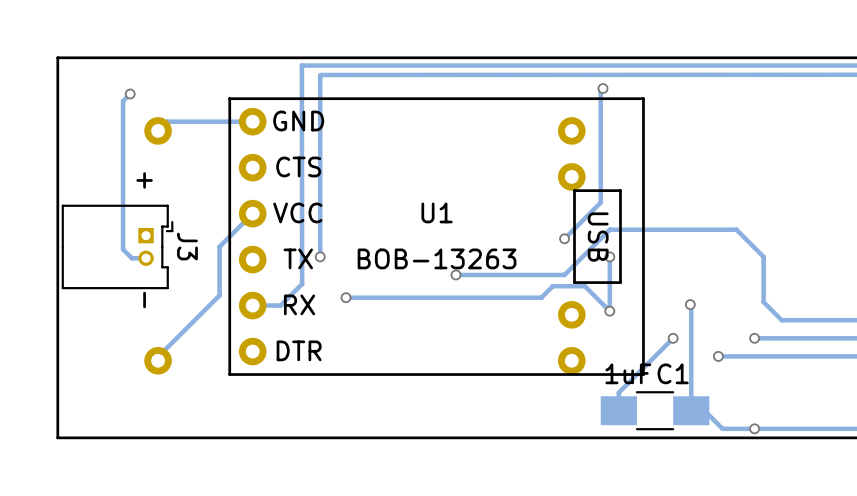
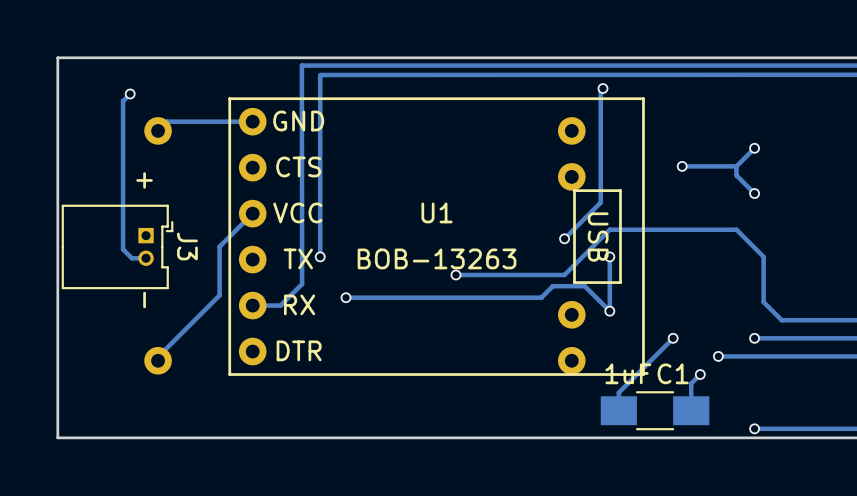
track: none -> (754, 148) (736, 166)
via: none -> (754, 148)
via: none -> (682, 166)
track: none -> (736, 166) (736, 175) (754, 193)
track: none -> (736, 166) (682, 166)
via: none -> (754, 193)
track: (690, 304) (691, 383) -> (700, 374) (691, 383)
via: (690, 304) -> none
via: none -> (700, 374)
track: (691, 410) (704, 410) (722, 428) (754, 428) -> none

